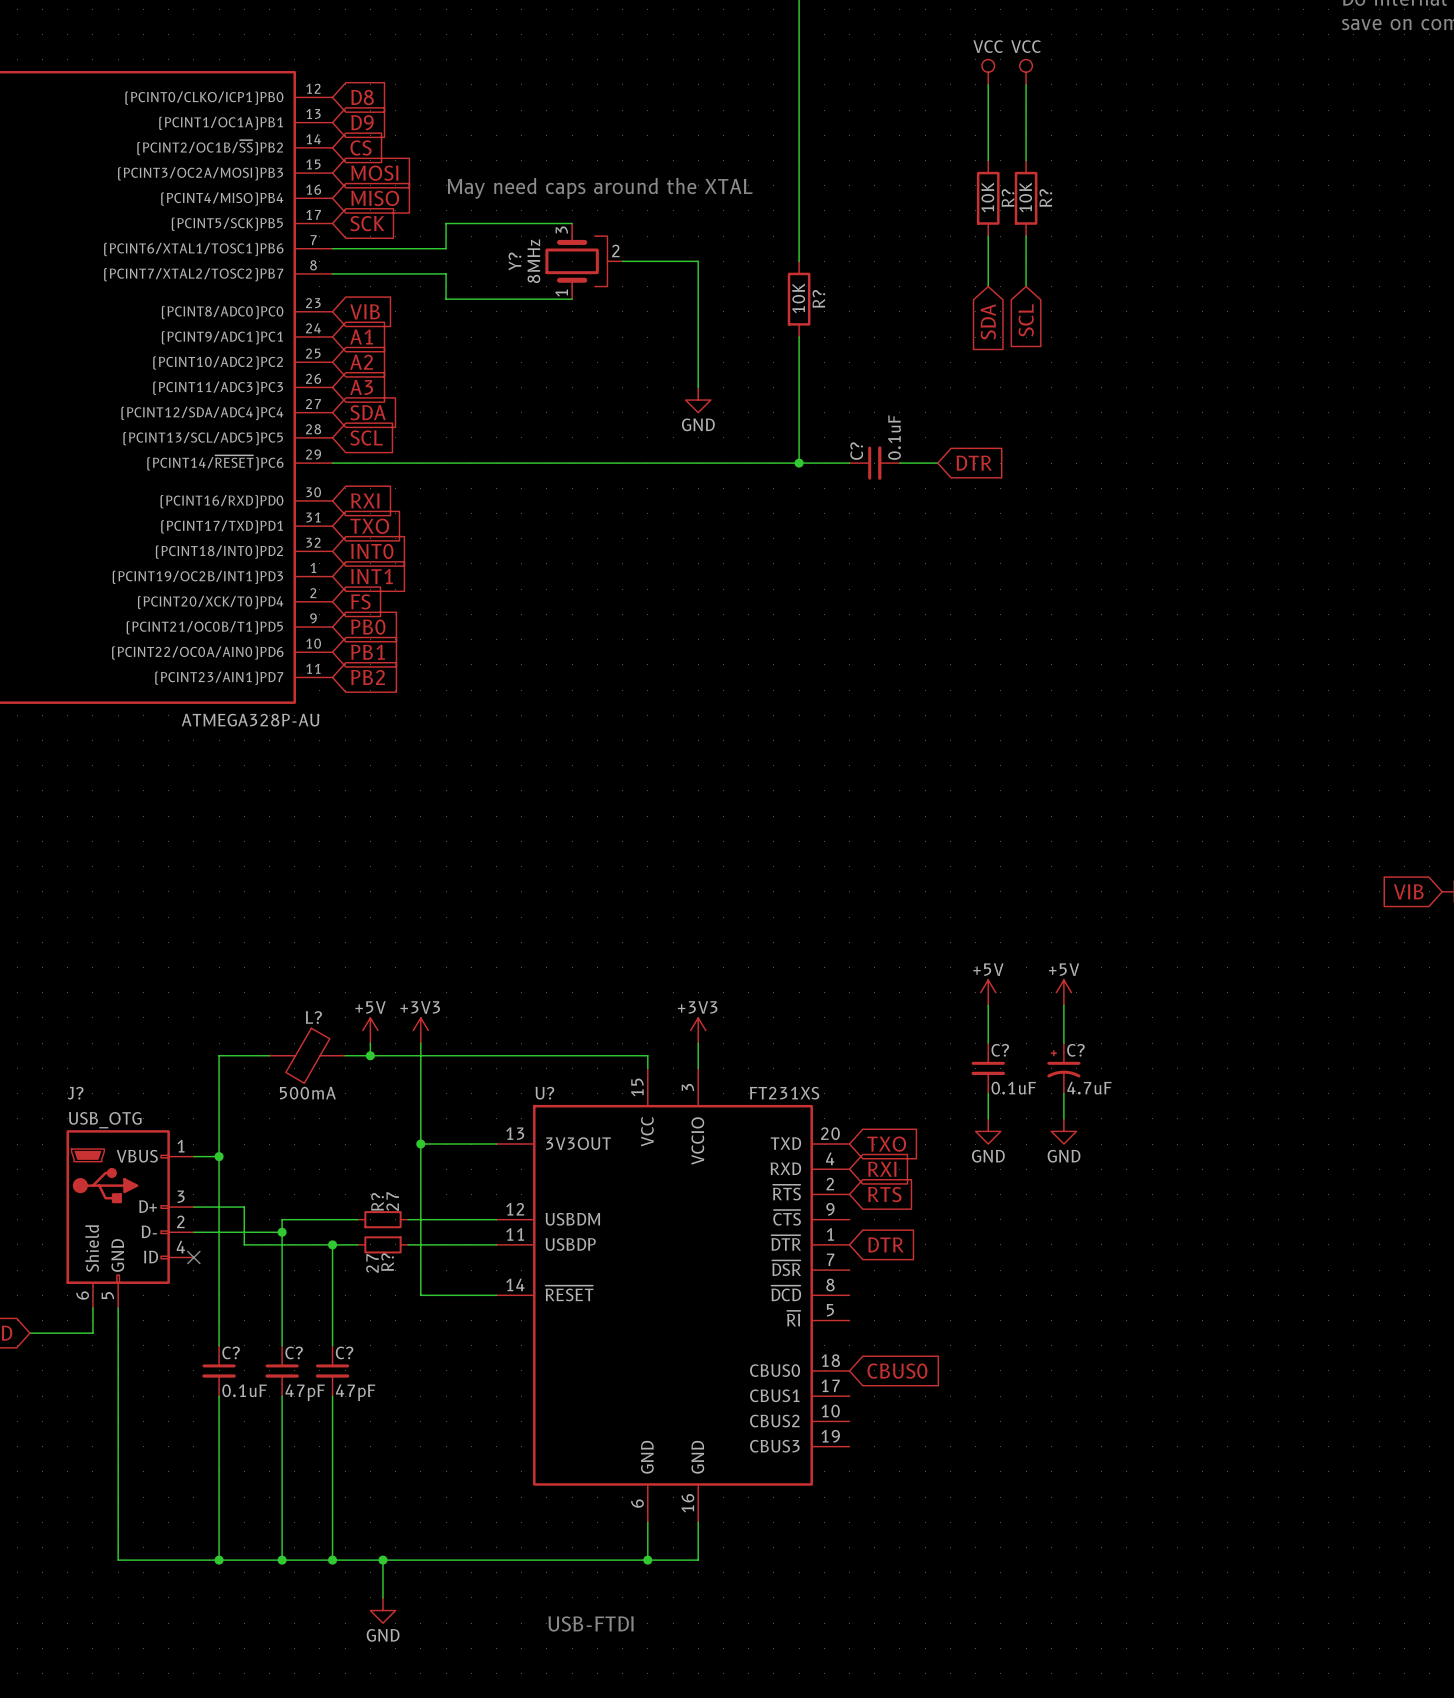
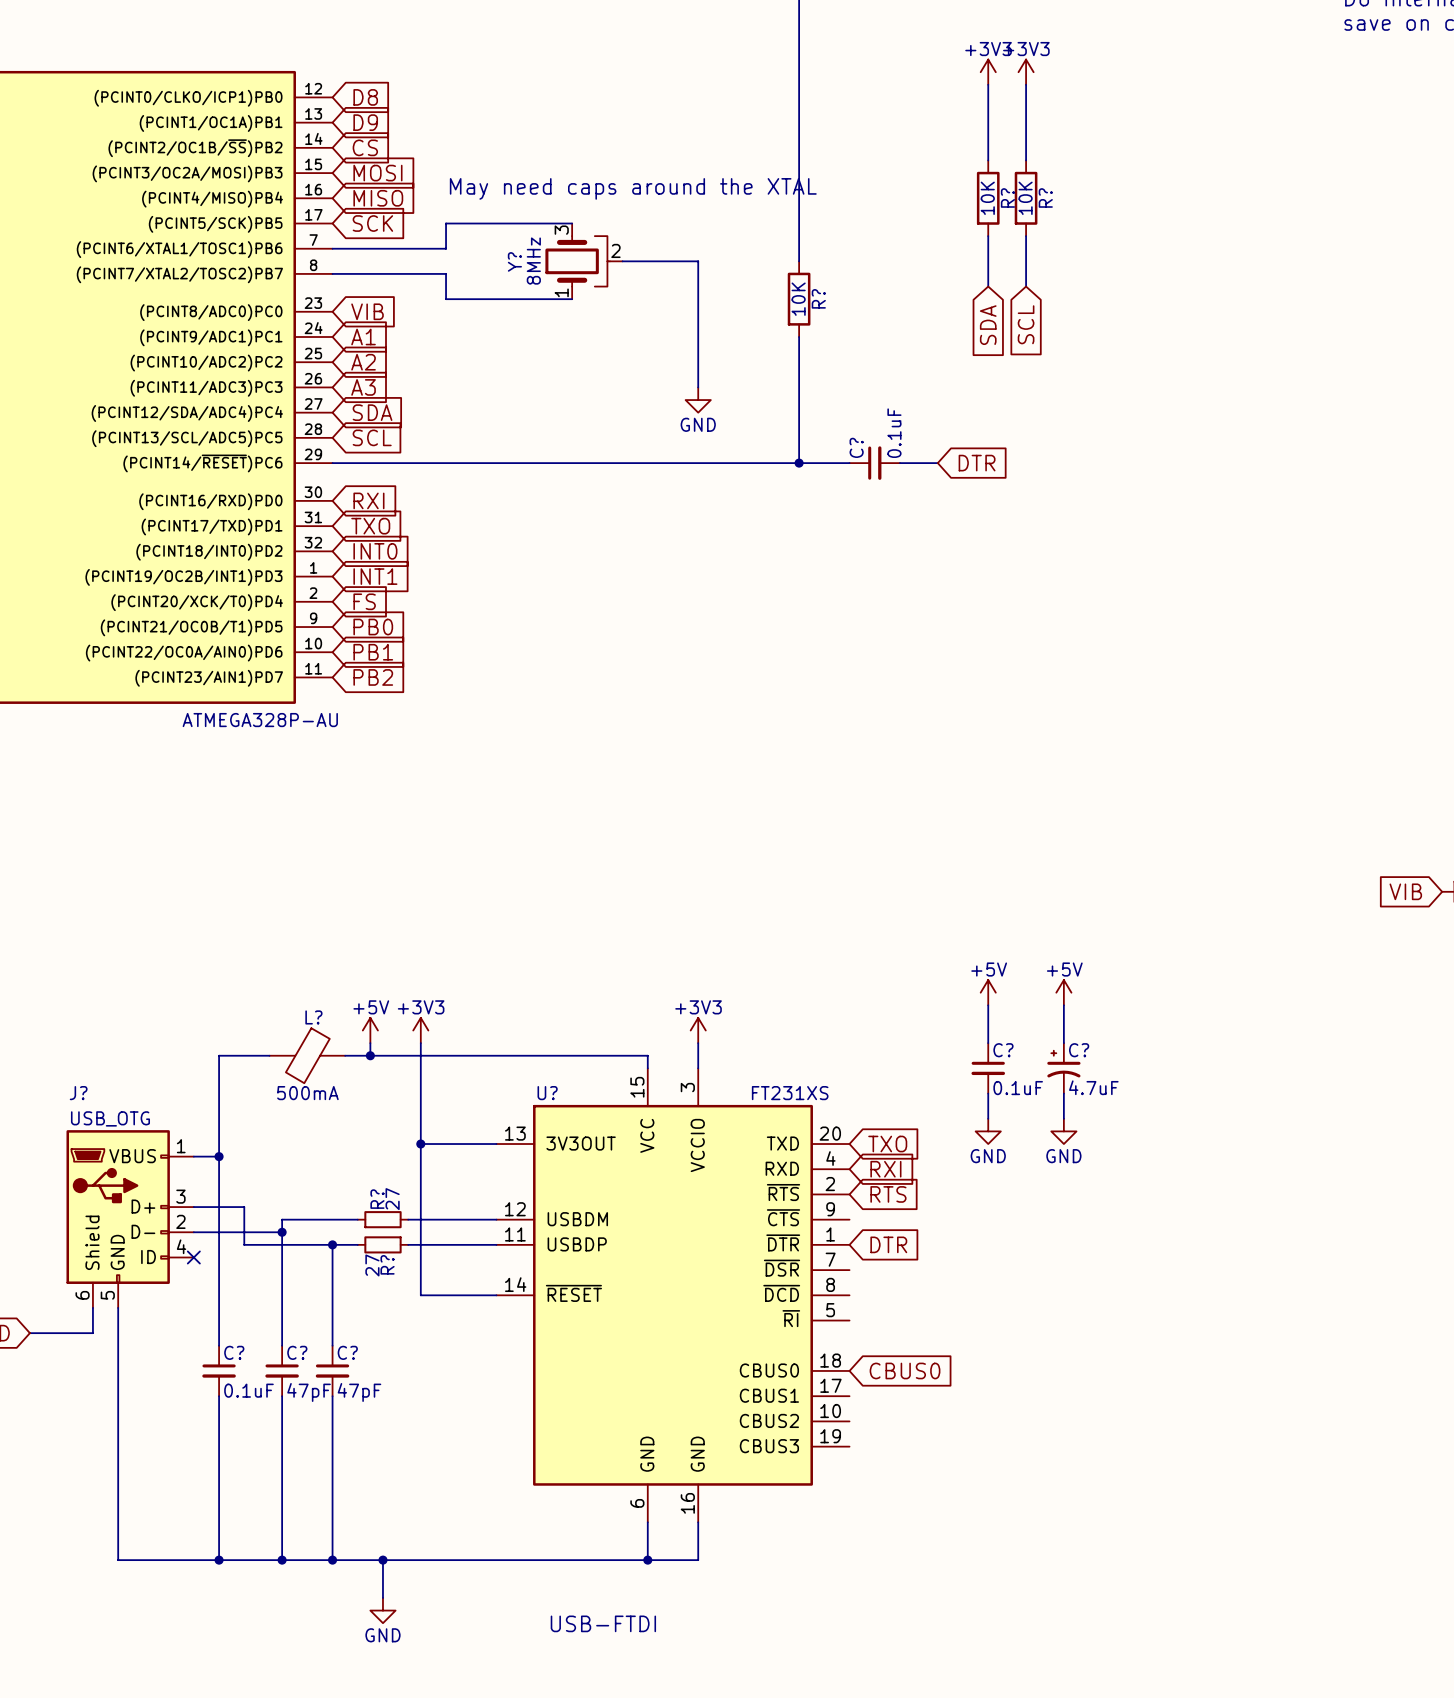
power symbol: VCC (988, 72) -> +3V3 (988, 72)
power symbol: VCC (1026, 72) -> +3V3 (1026, 72)

